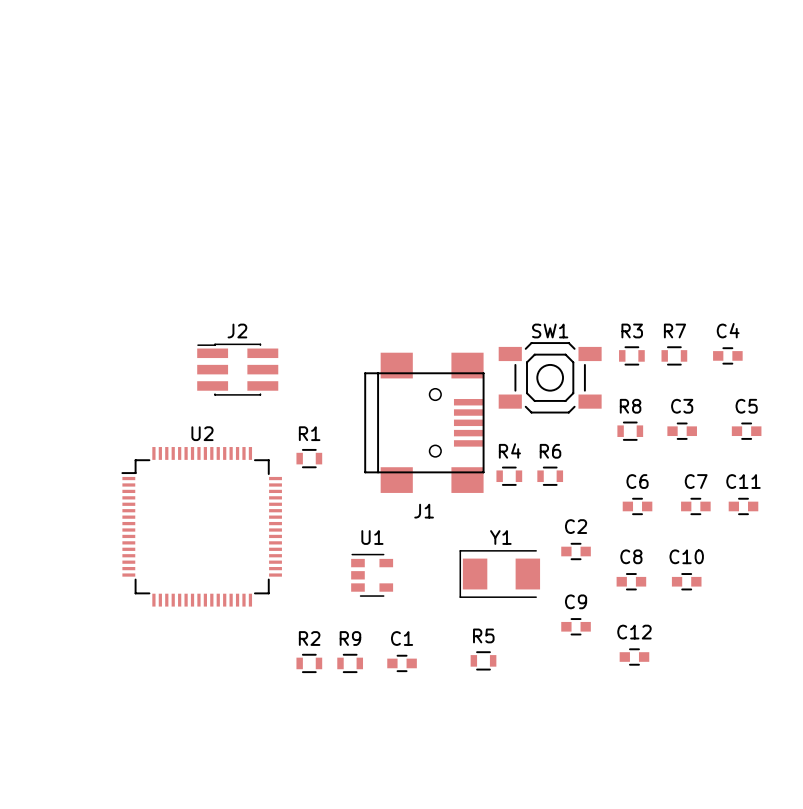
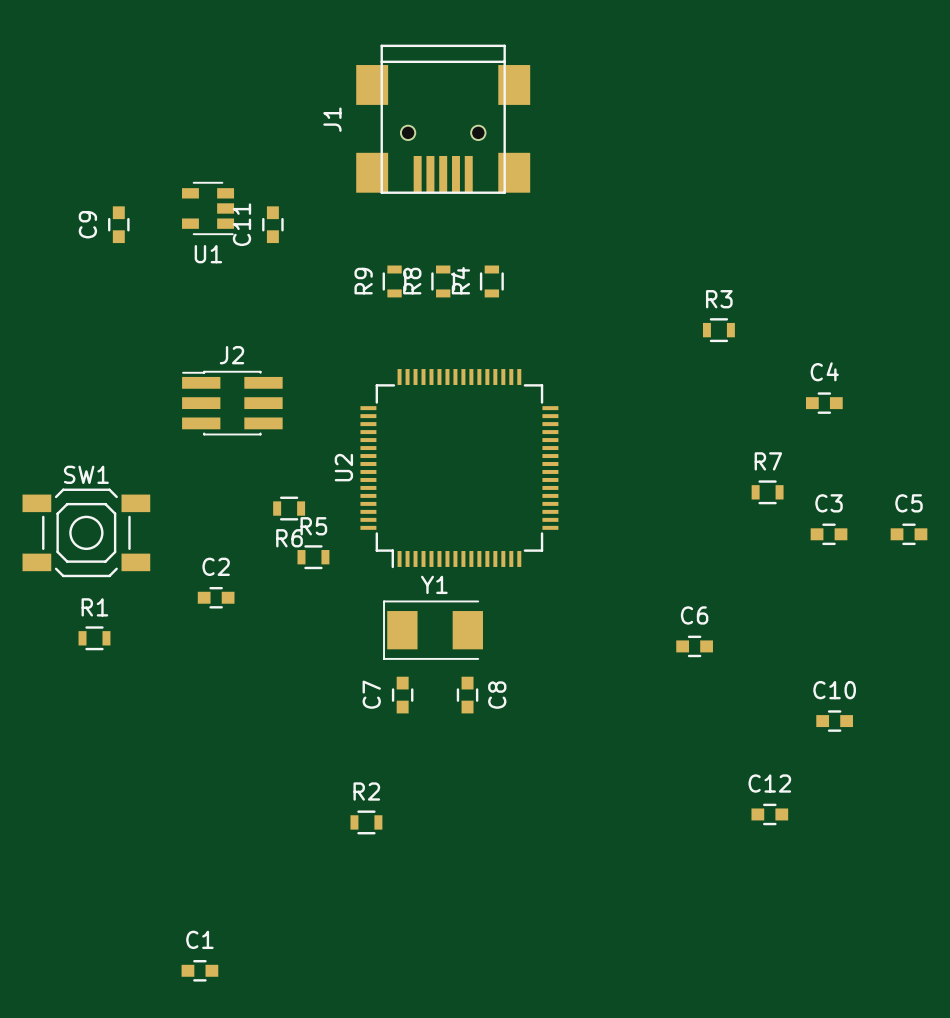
R3 position: (631, 355) -> (718, 330)
R7 position: (674, 355) -> (767, 492)
C4 position: (727, 355) -> (824, 403)
J2 position: (237, 369) -> (232, 403)
SW1 position: (550, 377) -> (86, 532)
R8 name position: R8 (630, 406) -> R8 (412, 281)
J1 rotation: 0° (424, 422) -> 90° clockwise (443, 119)
J1 position: (424, 422) -> (443, 119)
R8 rotation: 0° (630, 431) -> 90° clockwise (443, 281)
R8 position: (630, 431) -> (443, 281)
R4 name position: R4 (509, 450) -> R4 (460, 280)
R6 name position: R6 (550, 451) -> R6 (289, 538)
R1 position: (309, 458) -> (94, 638)
R4 rotation: 0° (509, 476) -> 90° clockwise (491, 281)
R4 position: (509, 476) -> (491, 281)
R6 position: (550, 476) -> (289, 508)
C7 name position: C7 (696, 481) -> C7 (371, 694)
C11 name position: C11 (743, 481) -> C11 (241, 224)
C6 position: (637, 506) -> (694, 646)
C7 rotation: 0° (695, 506) -> 90° clockwise (402, 695)
C7 position: (695, 506) -> (402, 695)
C11 rotation: 0° (743, 506) -> 90° clockwise (272, 224)
C11 position: (743, 506) -> (272, 224)
U2 rotation: 0° (201, 526) -> 90° counterclockwise (459, 468)
U2 position: (201, 526) -> (459, 468)
C2 position: (576, 551) -> (216, 597)
Y1 position: (499, 574) -> (433, 630)
U1 rotation: 0° (372, 575) -> 180° (208, 208)
U1 position: (372, 575) -> (208, 208)
C8 rotation: 0° (631, 581) -> 90° clockwise (467, 695)
C8 position: (631, 581) -> (467, 695)
C9 name position: C9 (576, 601) -> C9 (87, 224)
C9 rotation: 0° (576, 626) -> 90° clockwise (118, 224)
C9 position: (576, 626) -> (118, 224)
R9 name position: R9 (350, 638) -> R9 (363, 281)
R5 position: (483, 660) -> (313, 557)
R9 rotation: 0° (350, 663) -> 90° clockwise (394, 281)
R9 position: (350, 663) -> (394, 281)
C1 position: (402, 663) -> (199, 970)

